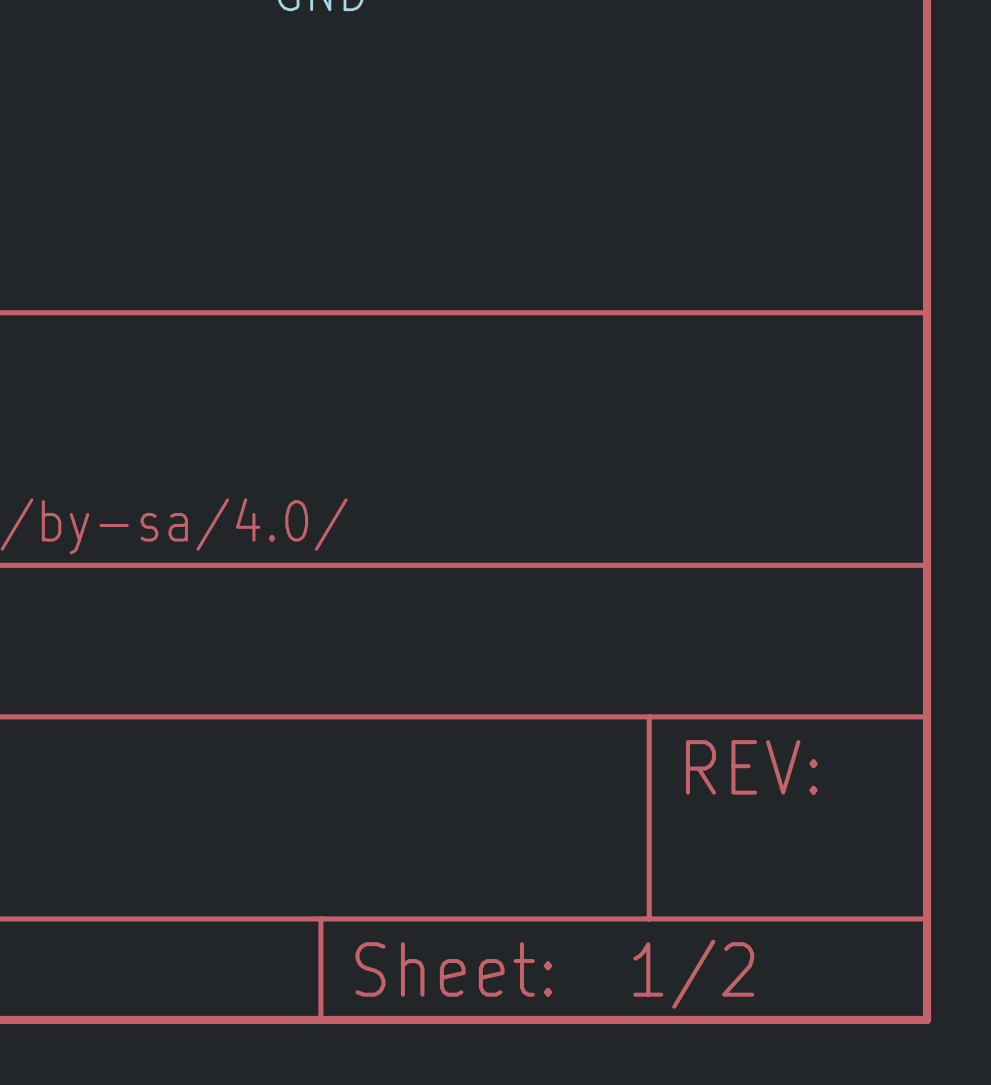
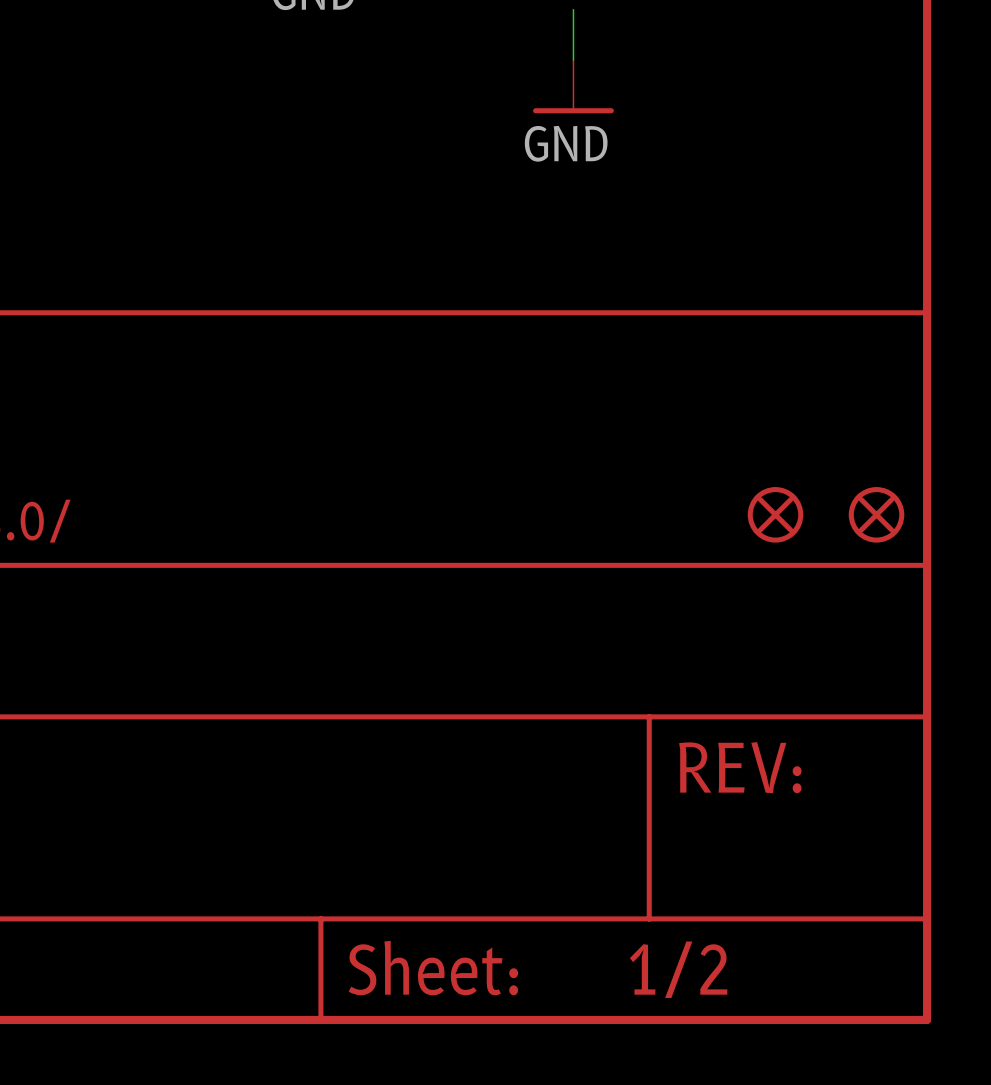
wire: none -> (573, 9) (573, 60)
power symbol: none -> GND (573, 86)
part: none -> (775, 514)
part: none -> (876, 514)

